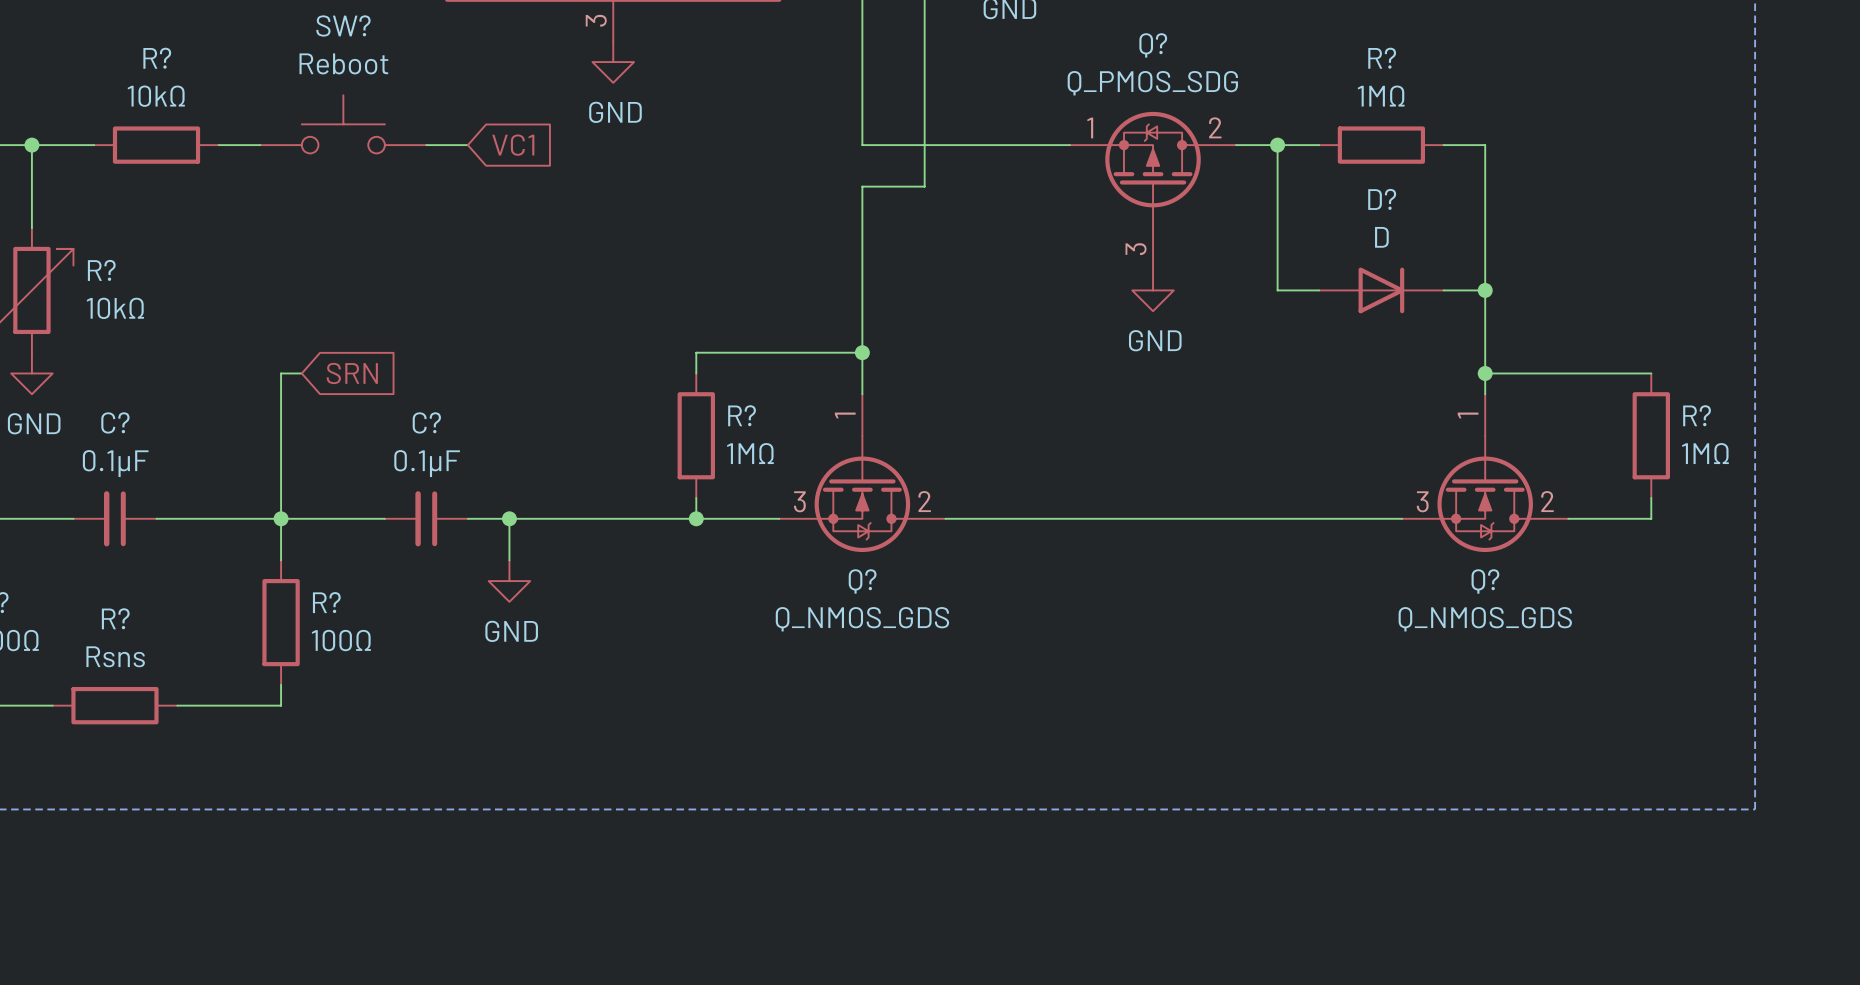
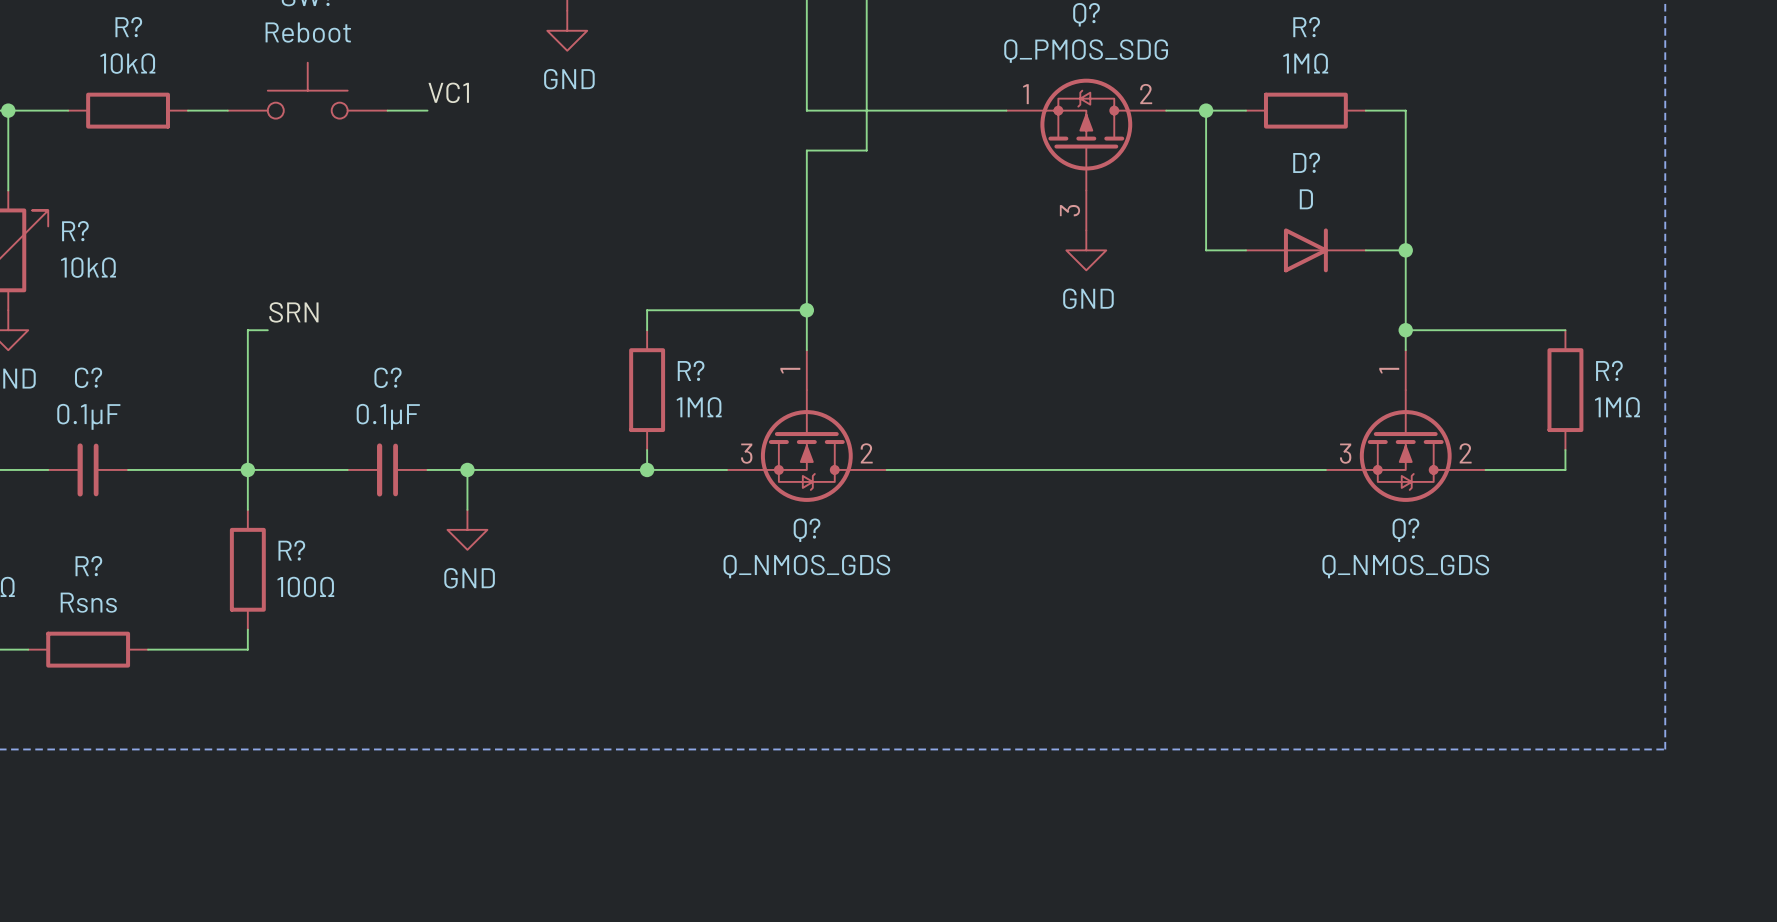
label: none -> VC1 (448, 92)
global label: VC1 (513, 145) -> none
label: none -> SRN (293, 312)
global label: SRN (352, 373) -> none

